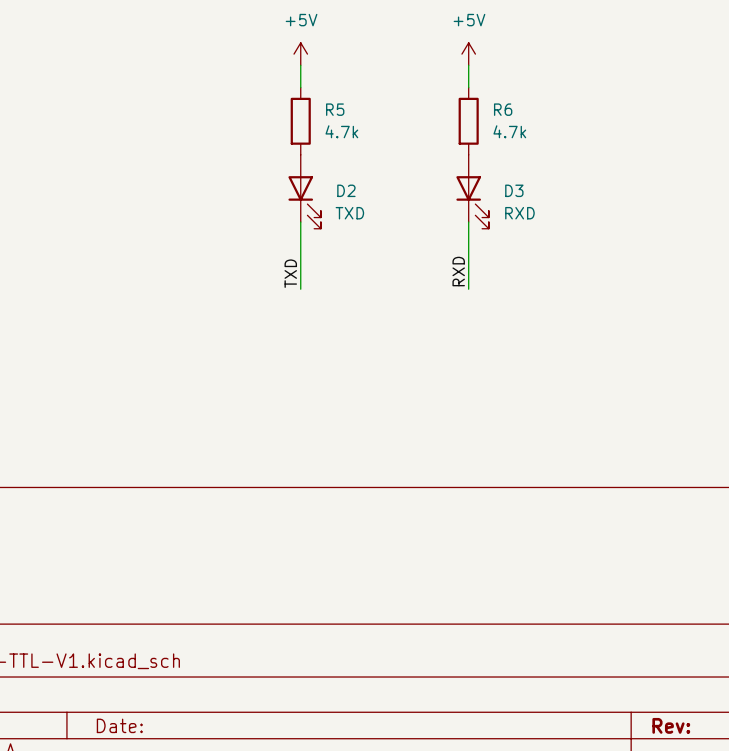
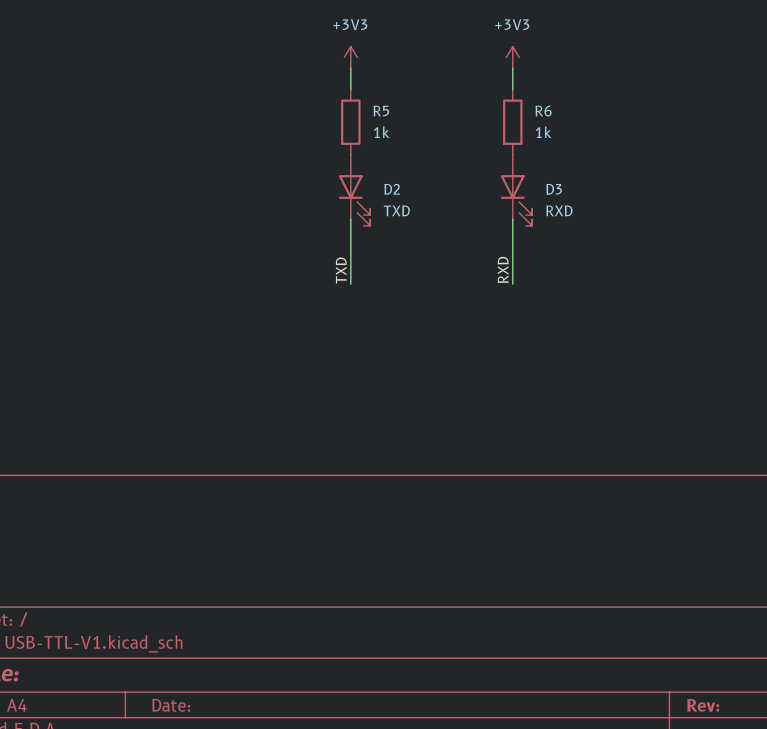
power symbol: +5V (300, 54) -> +3V3 (350, 57)
power symbol: +5V (468, 54) -> +3V3 (512, 57)
R5 value: 4.7k (341, 131) -> 1k (381, 132)
R6 value: 4.7k (509, 131) -> 1k (543, 132)

